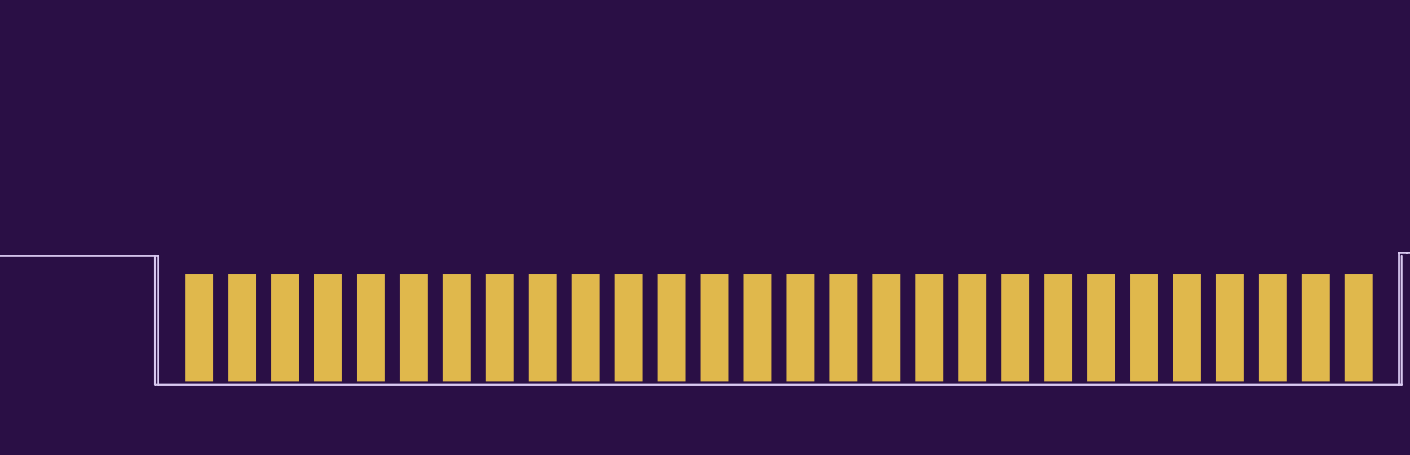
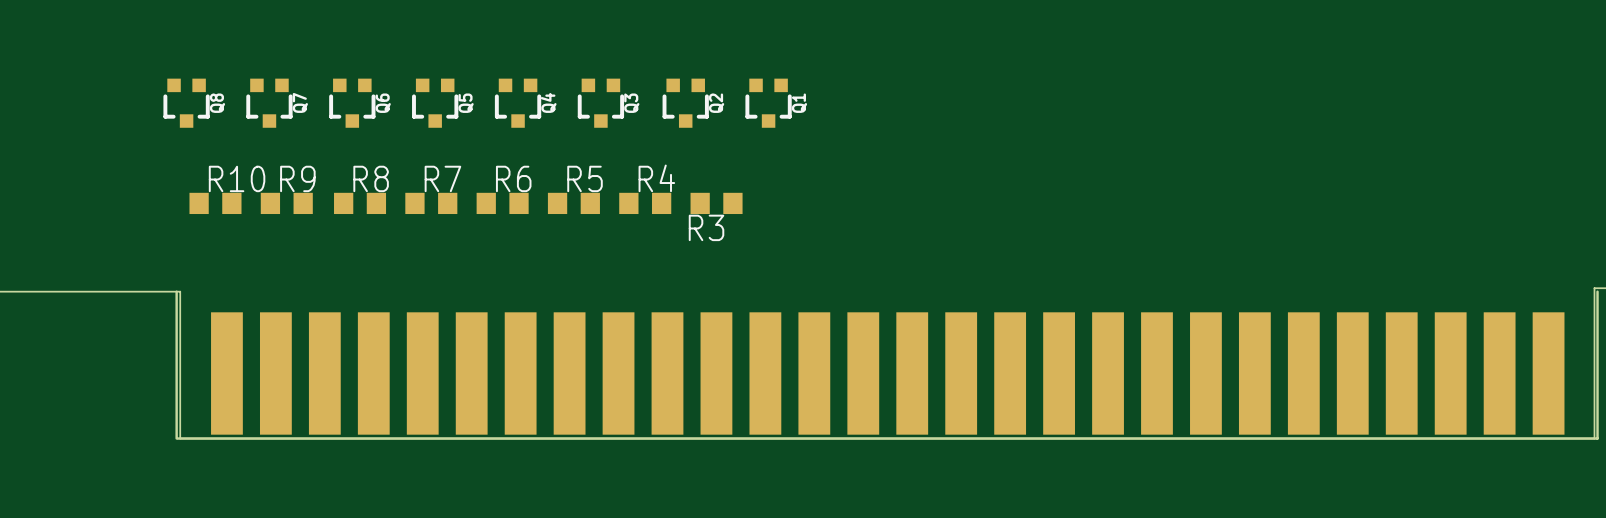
Q8: none -> (186, 103)
Q7: none -> (269, 103)
Q6: none -> (352, 103)
Q5: none -> (435, 103)
Q4: none -> (518, 103)
Q3: none -> (600, 103)
Q2: none -> (685, 103)
Q1: none -> (768, 103)
R10: none -> (215, 203)
R9: none -> (286, 203)
R8: none -> (360, 203)
R7: none -> (431, 203)
R6: none -> (502, 203)
R5: none -> (573, 203)
R4: none -> (645, 203)
R3: none -> (716, 203)

